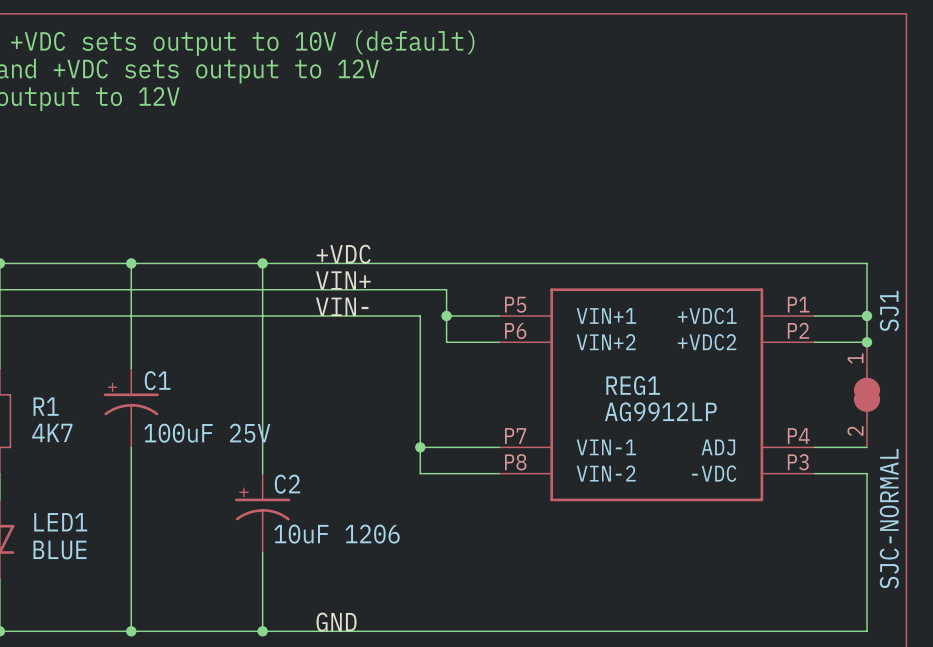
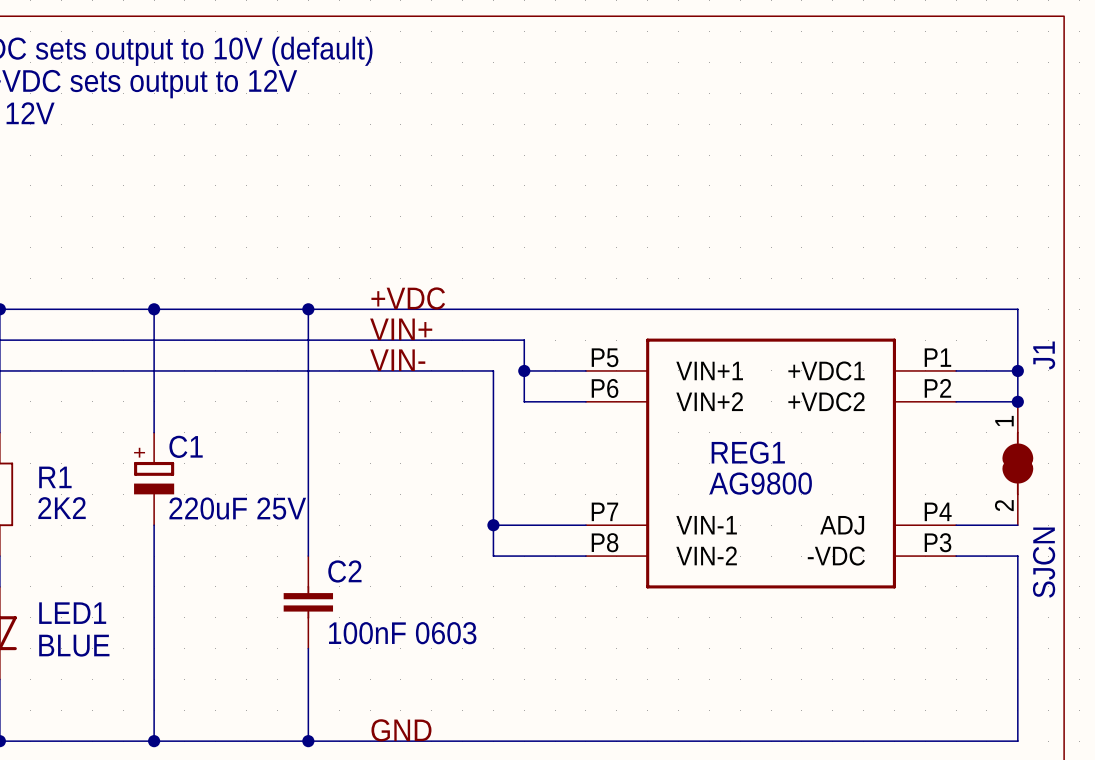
SJ1 name: SJ1 (889, 311) -> J1 (1044, 355)
C1 symbol: [103, 368, 159, 448] -> [134, 432, 175, 526]
REG1 value: AG9912LP (660, 411) -> AG9800 (760, 483)
R1 value: 4K7 (52, 432) -> 2K2 (62, 508)
C1 value: 100uF 25V (207, 433) -> 220uF 25V (237, 508)
C2 symbol: [235, 473, 291, 553] -> [283, 556, 334, 649]
SJ1 value: SJC-NORMAL (889, 518) -> SJCN (1044, 562)
C2 value: 10uF 1206 (337, 534) -> 100nF 0603 (402, 633)

